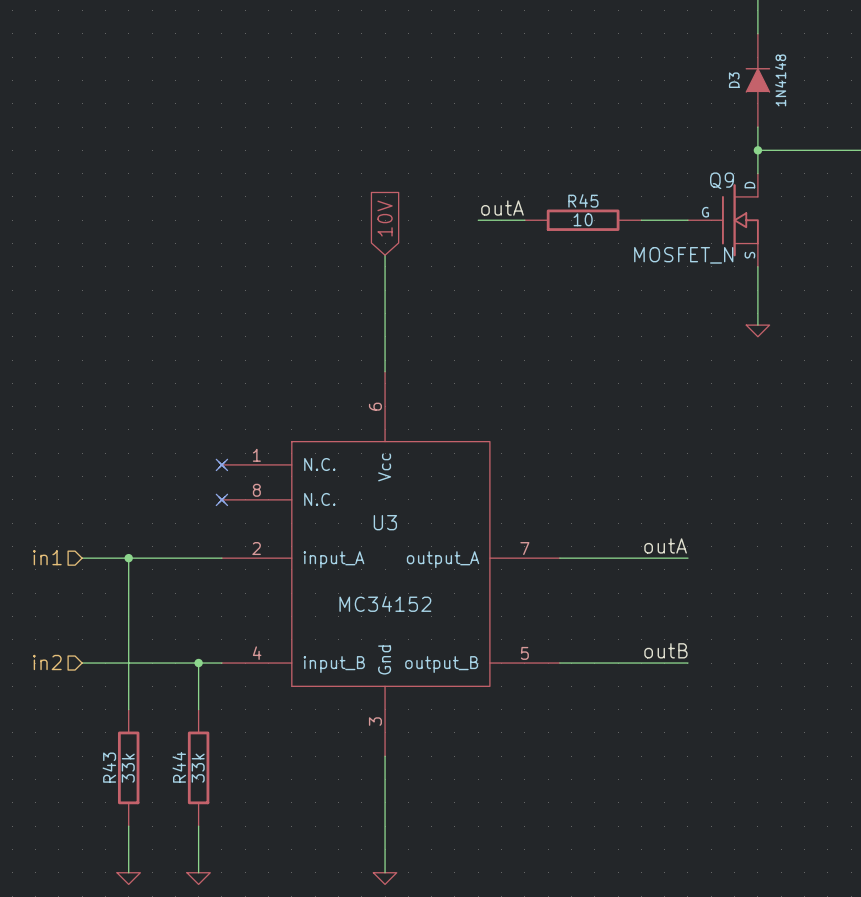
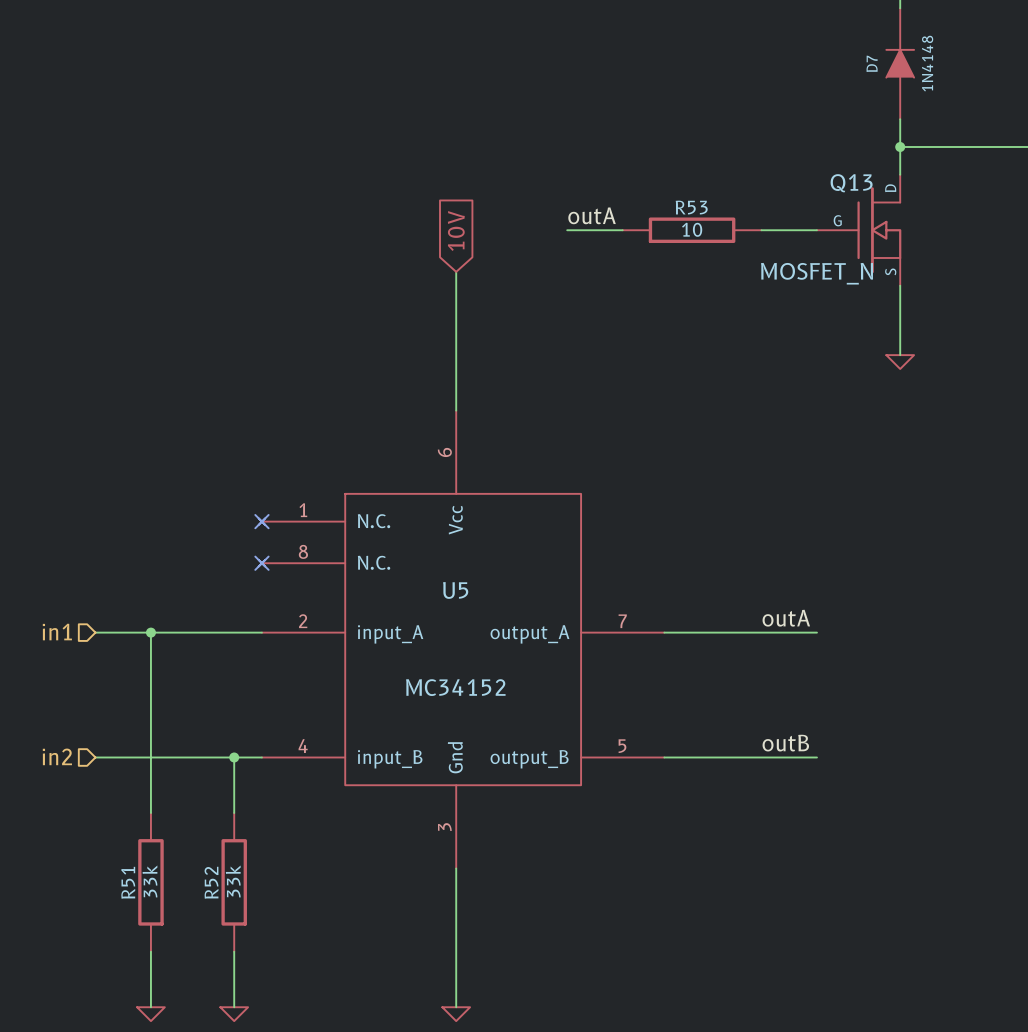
D3 name: D3 (734, 80) -> D7 (872, 63)
Q9 name: Q9 (722, 180) -> Q13 (851, 183)
R45 name: R45 (583, 200) -> R53 (691, 207)
U3 name: U3 (385, 522) -> U5 (455, 590)
R43 name: R43 (109, 767) -> R51 (128, 882)
R44 name: R44 (179, 767) -> R52 (211, 882)

